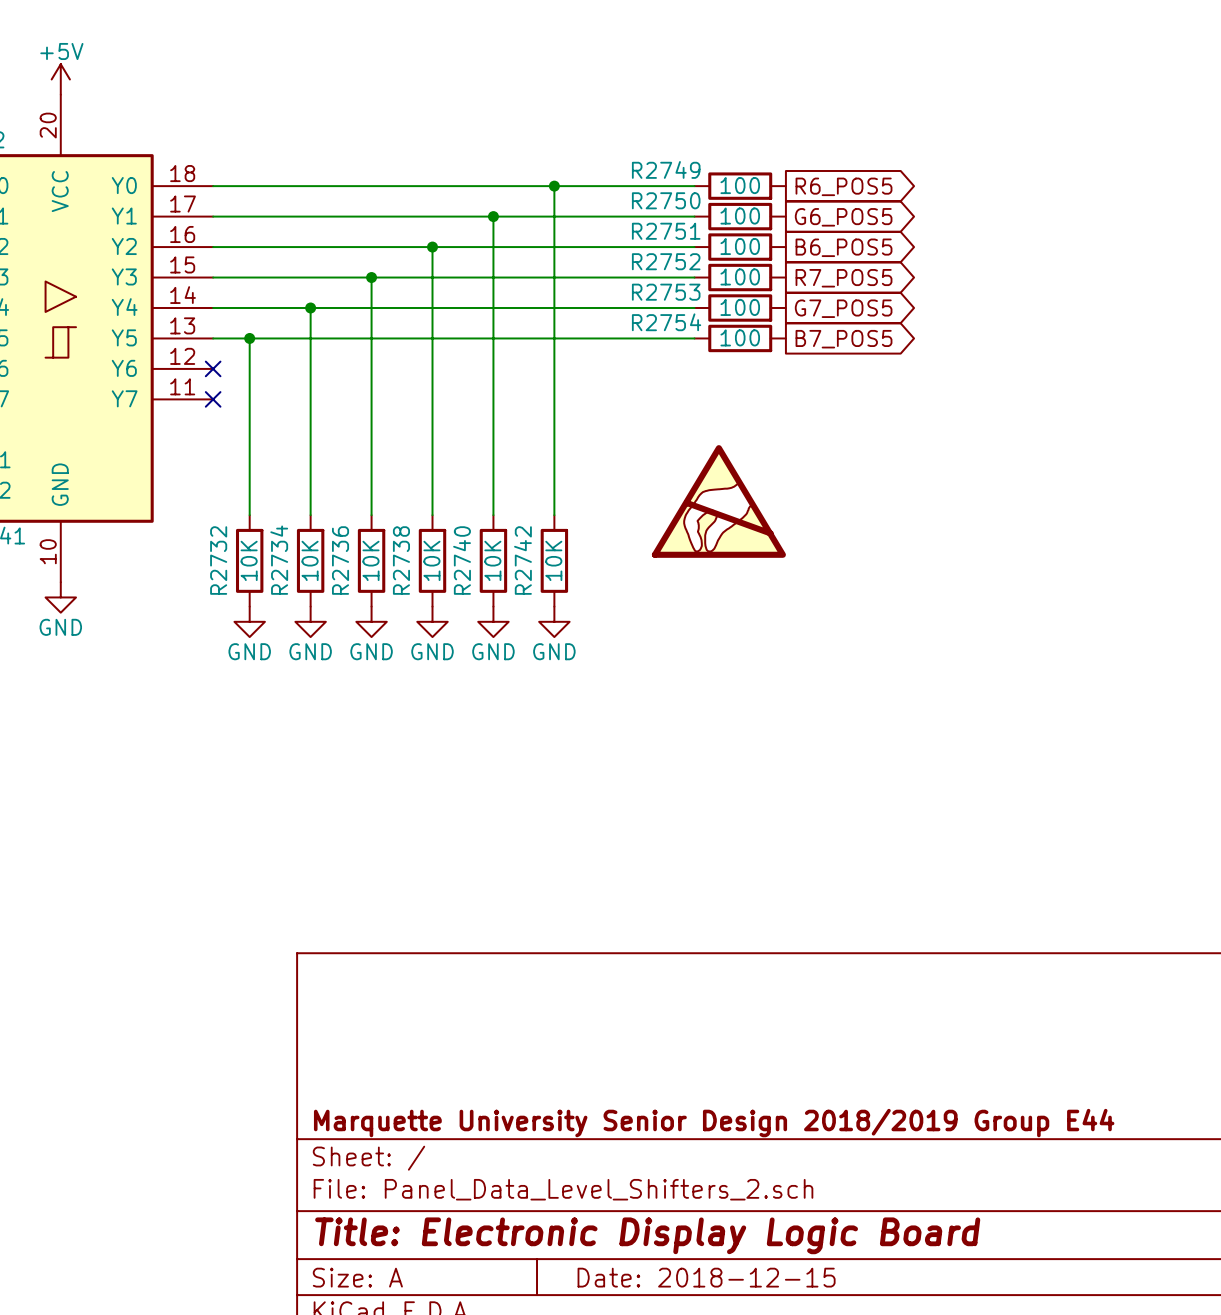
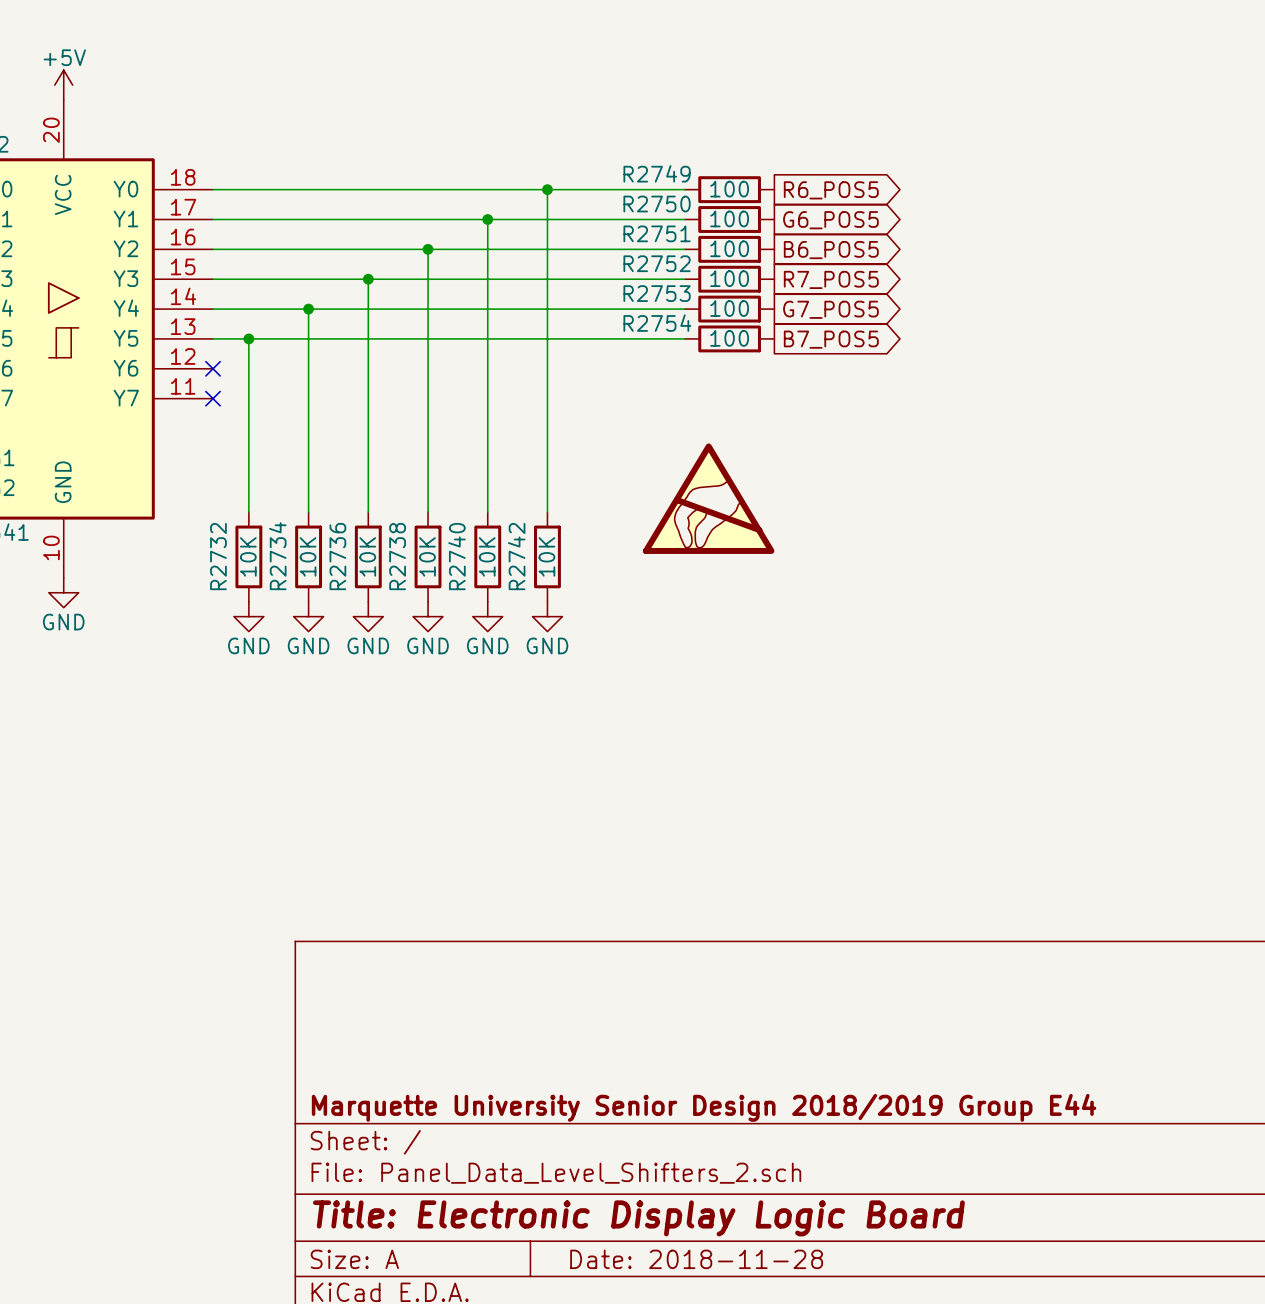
title block: Date: 2018-12-15 (706, 1277) -> Date: 2018-11-28 (696, 1259)

